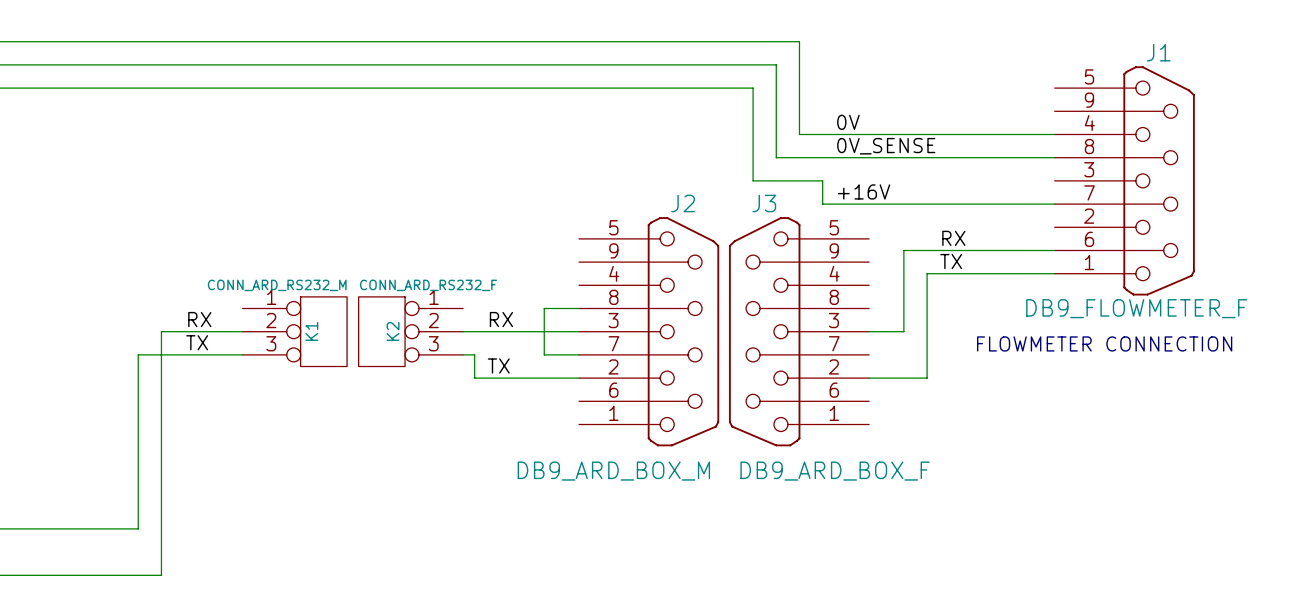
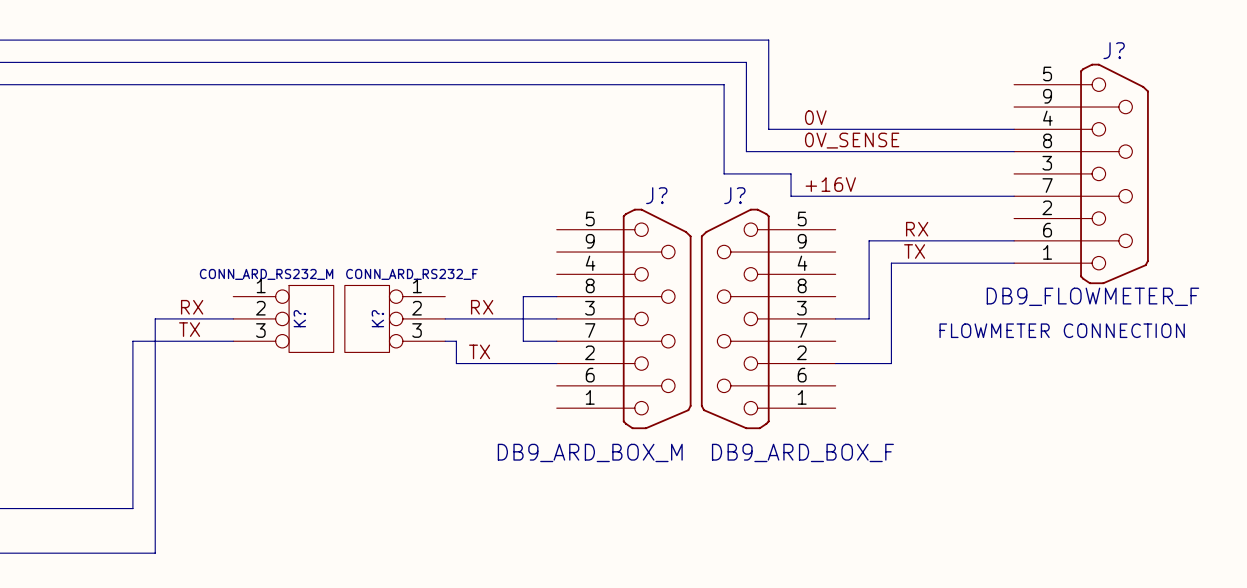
J1 name: J1 (1158, 52) -> J? (1114, 50)
J2 name: J2 (683, 203) -> J? (656, 195)
J3 name: J3 (764, 203) -> J? (734, 195)
K1 name: K1 (311, 331) -> K? (299, 318)
K2 name: K2 (393, 331) -> K? (377, 318)

